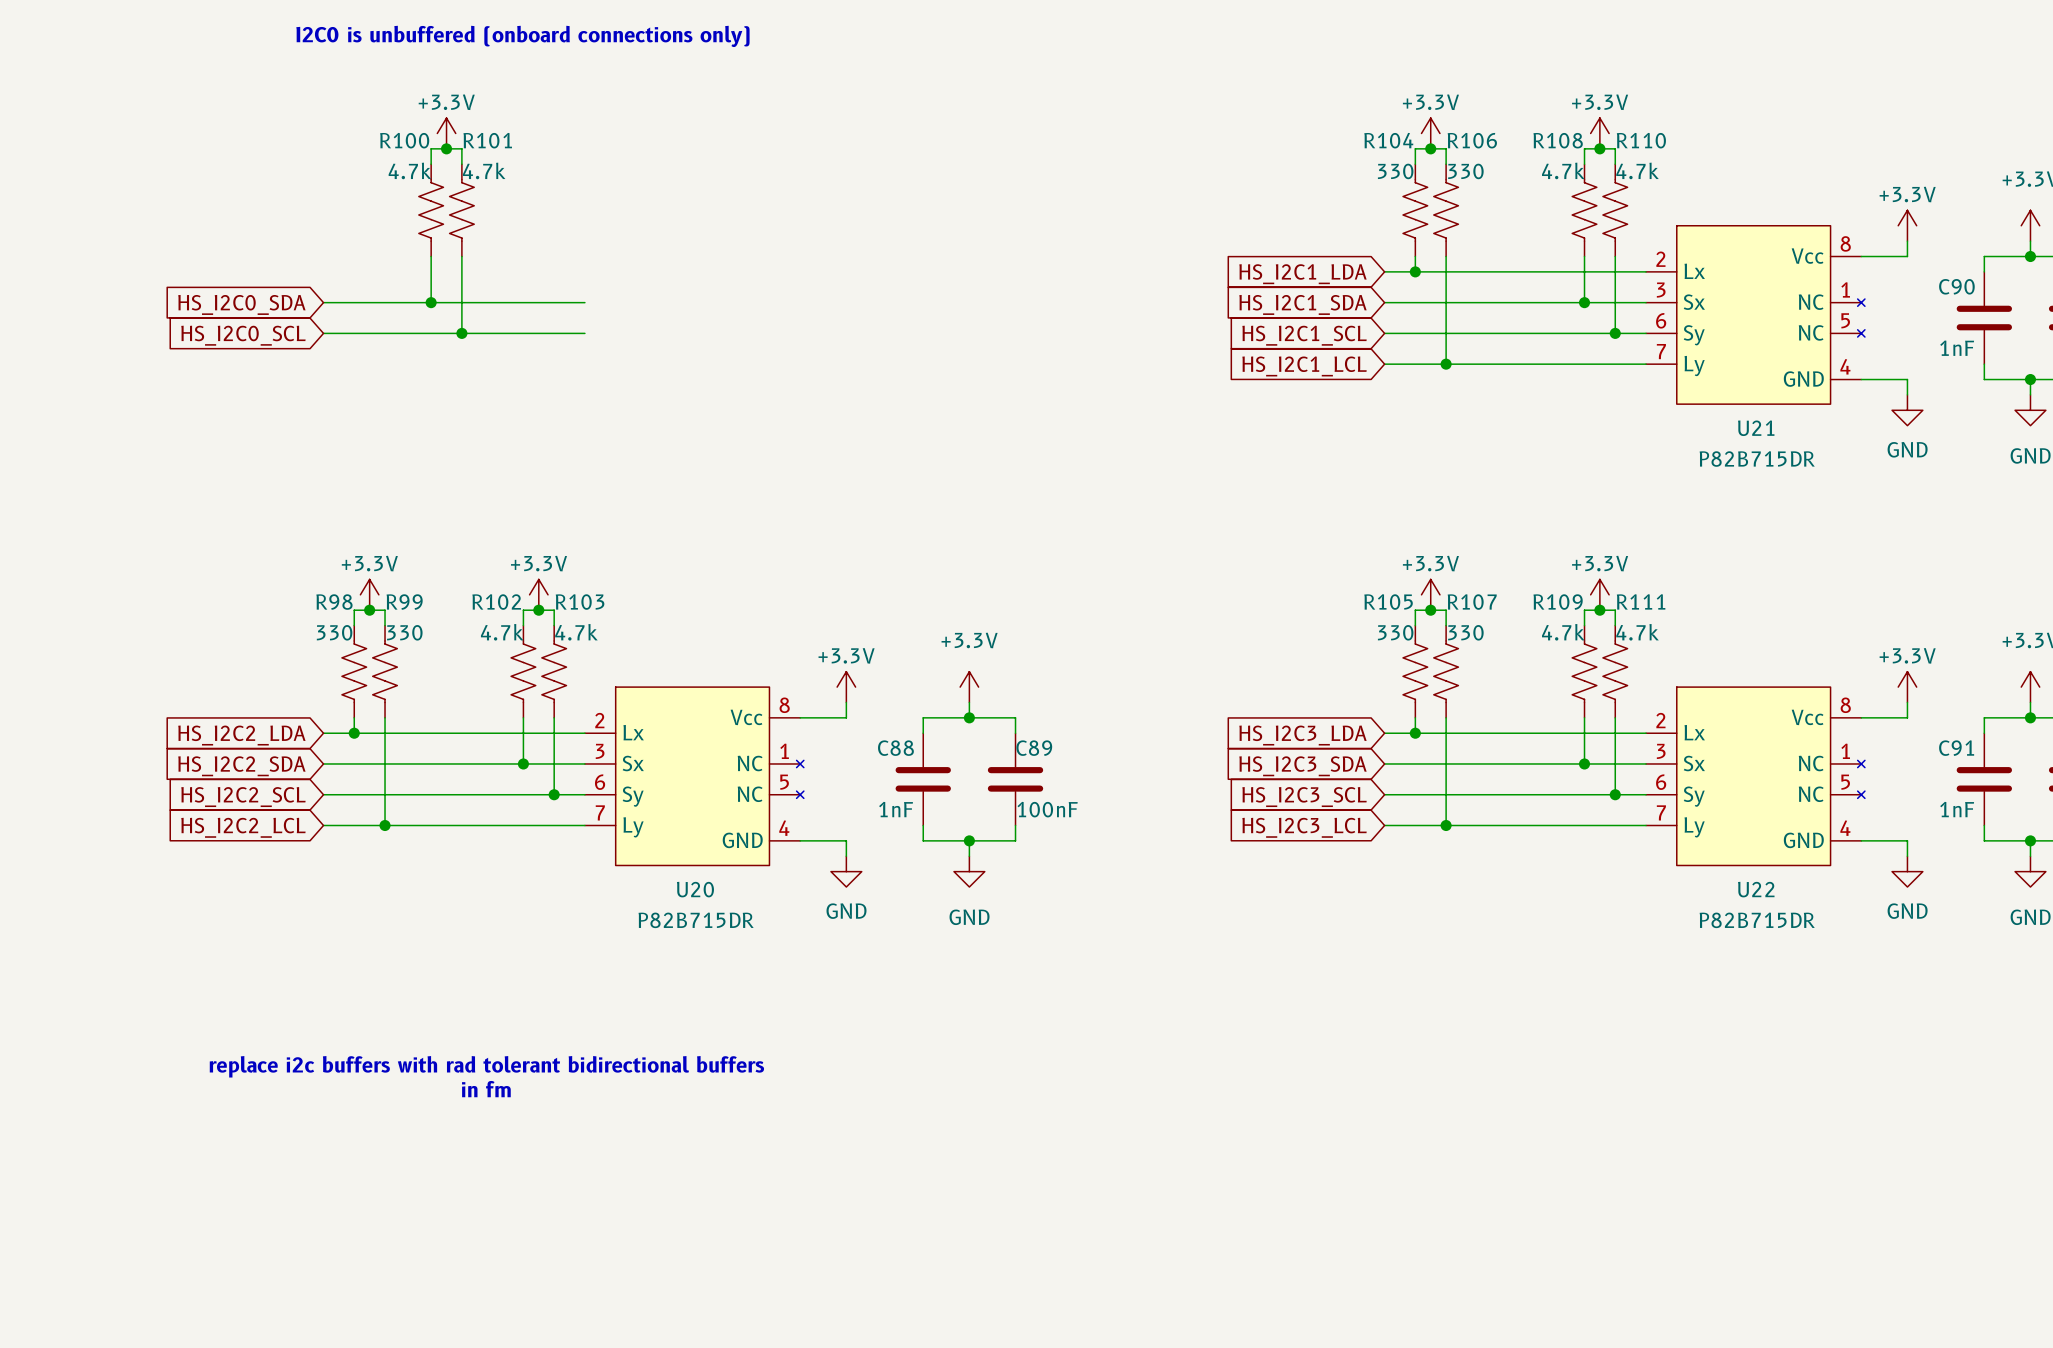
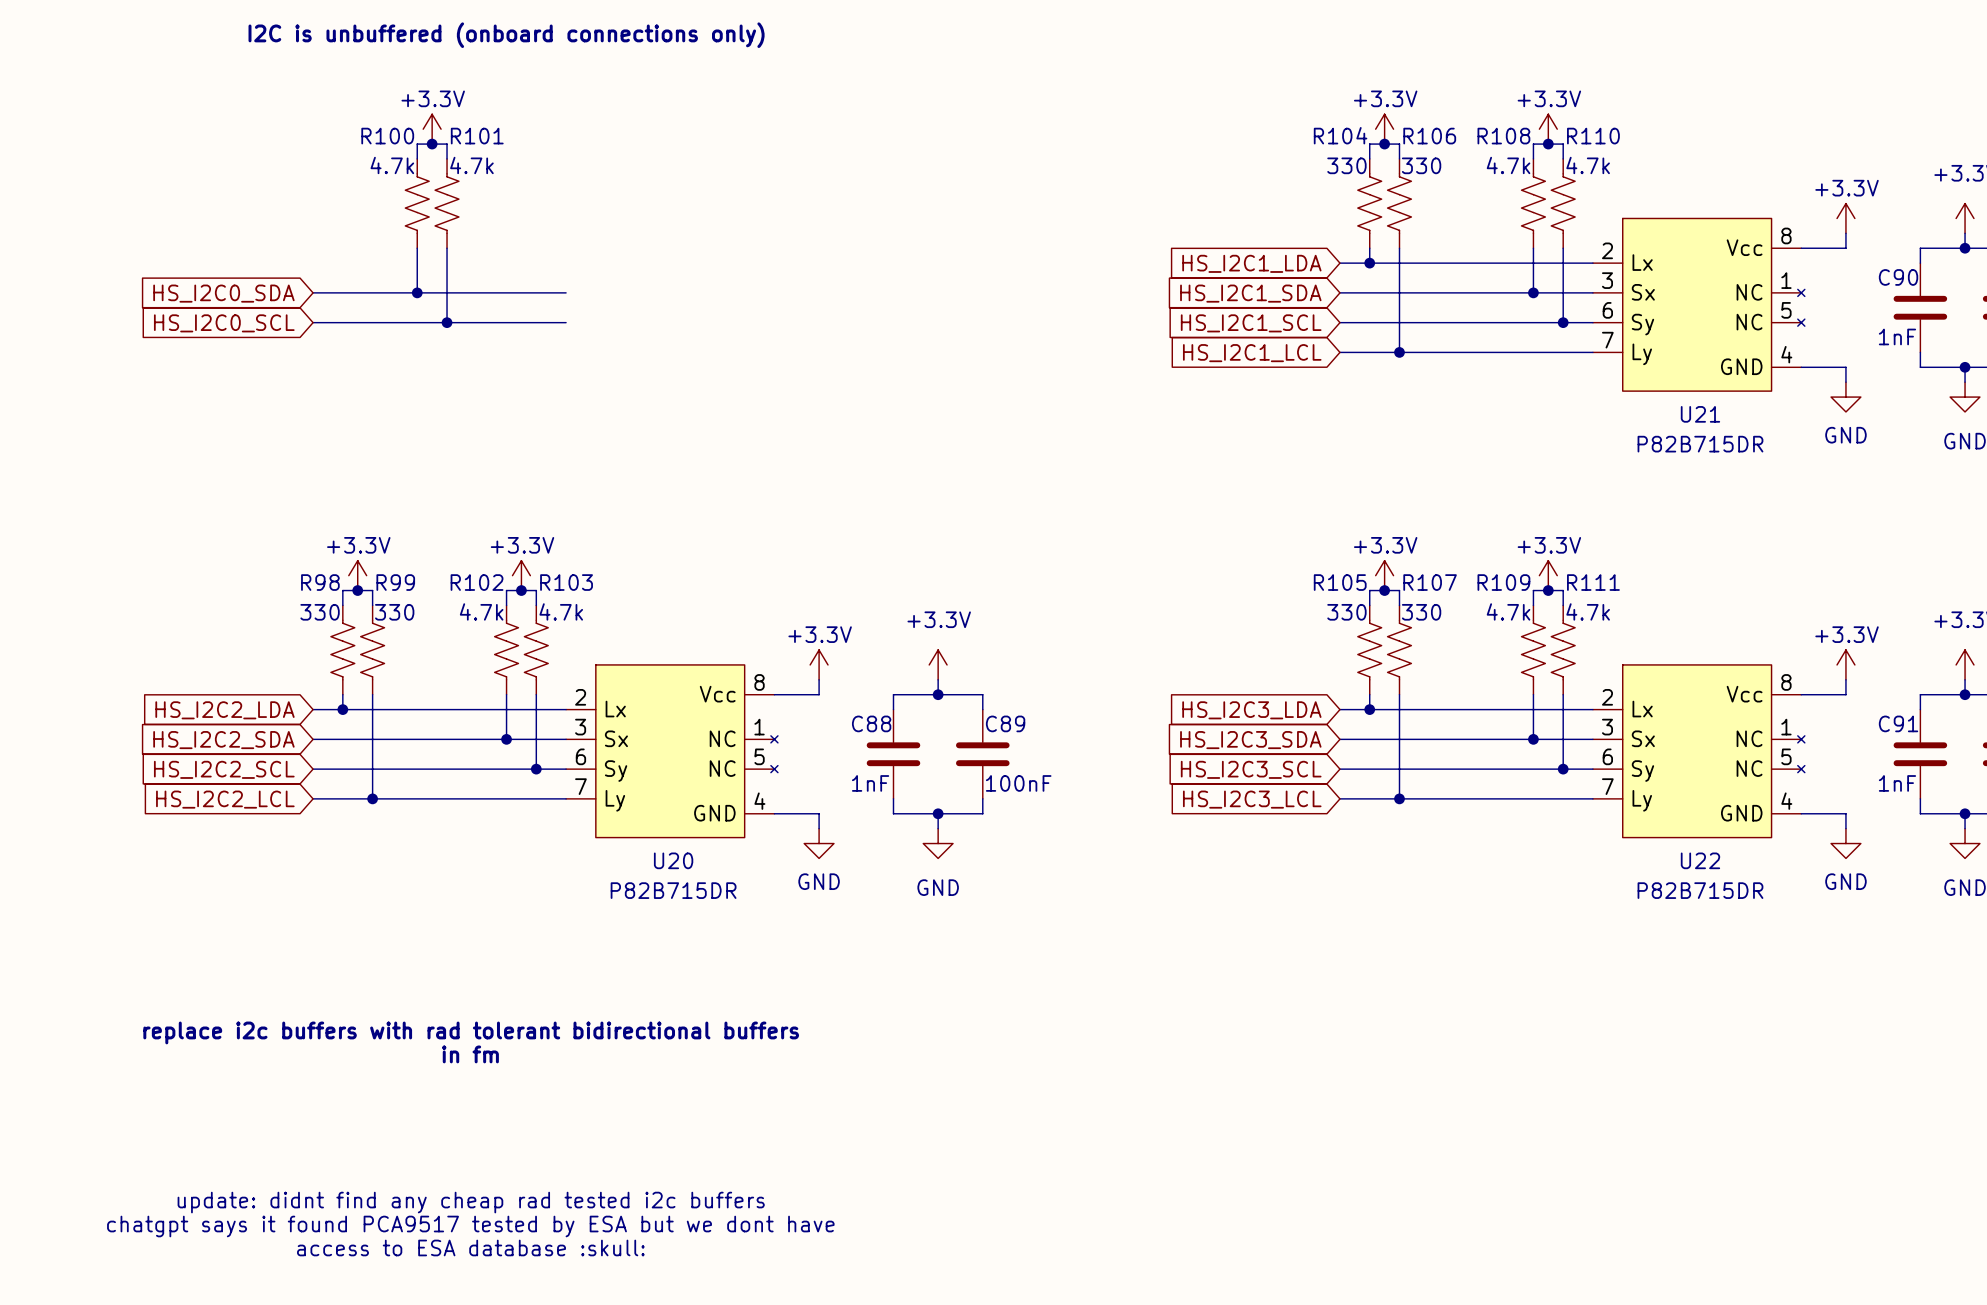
text: I2C0 is unbuffered (onboard connections only) (522, 36) -> I2C is unbuffered (onboard connections only) (506, 35)
text: none -> update: didnt find any cheap rad tested i2c buffers (471, 1202)
text: none -> chatgpt says it found PCA9517 tested by ESA but we dont have (470, 1226)
text: none -> access to ESA database :skull: (470, 1247)

